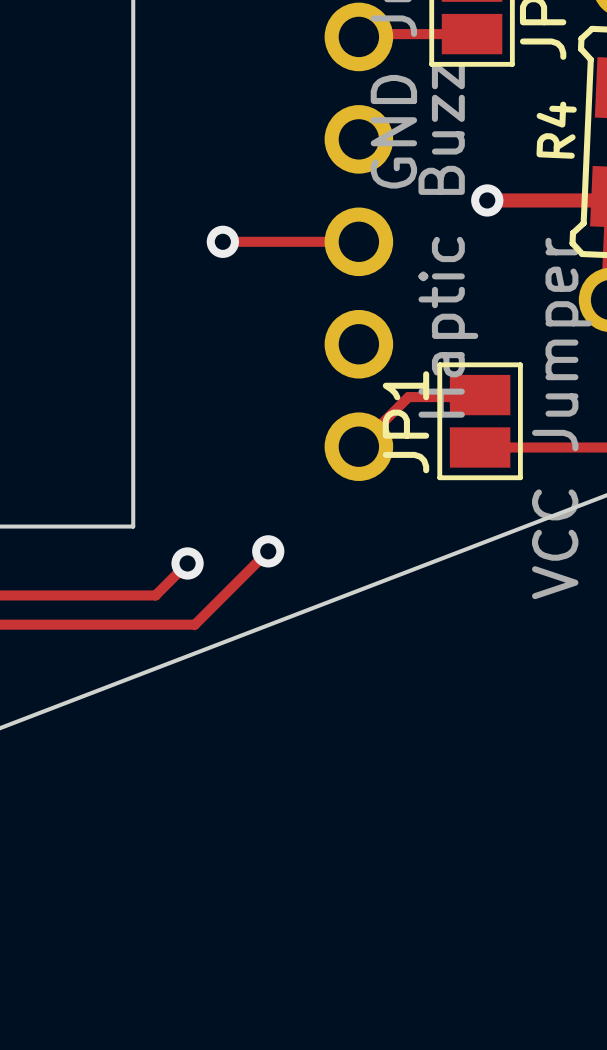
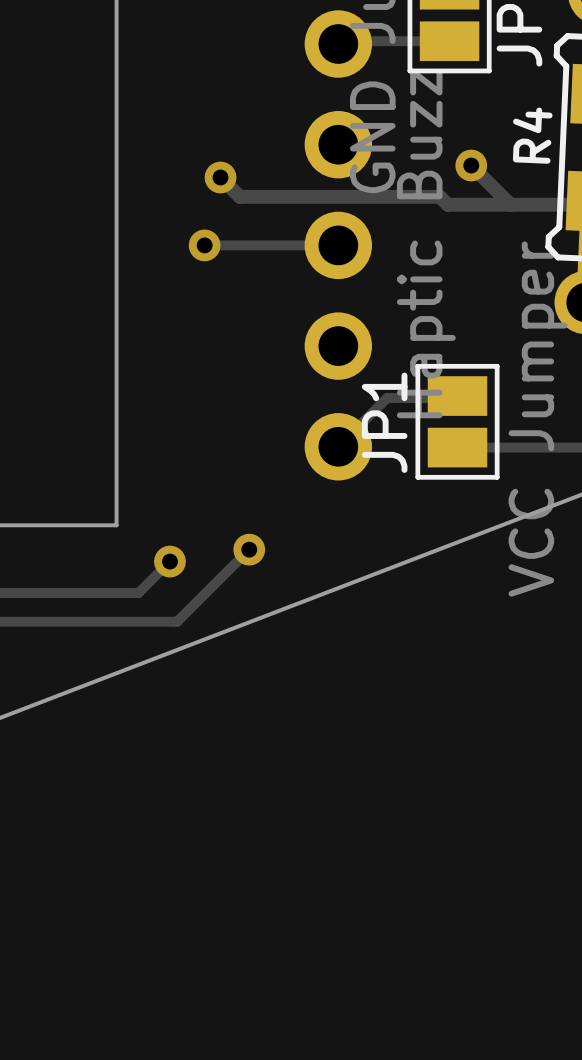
track: none -> (471, 165) (510, 204)
track: none -> (220, 177) (239, 196) (439, 196) (447, 204) (464, 204)
via: none -> (220, 177)
via position: (487, 200) -> (471, 165)

